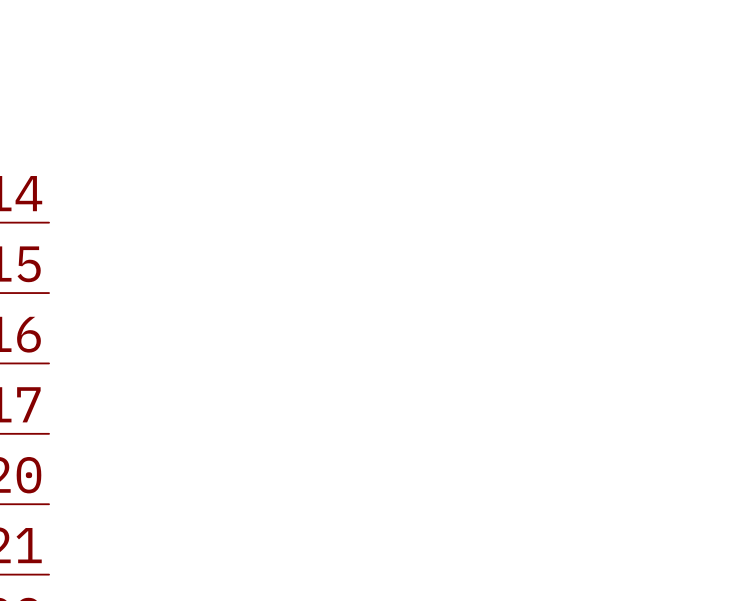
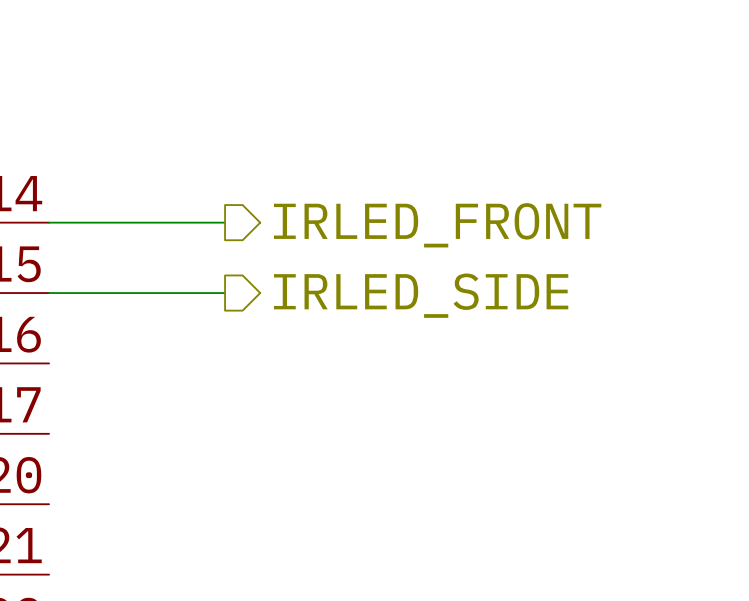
wire: none -> (49, 222) (225, 222)
hierarchical label: none -> IRLED_FRONT (437, 225)
wire: none -> (49, 293) (225, 293)
hierarchical label: none -> IRLED_SIDE (421, 295)

